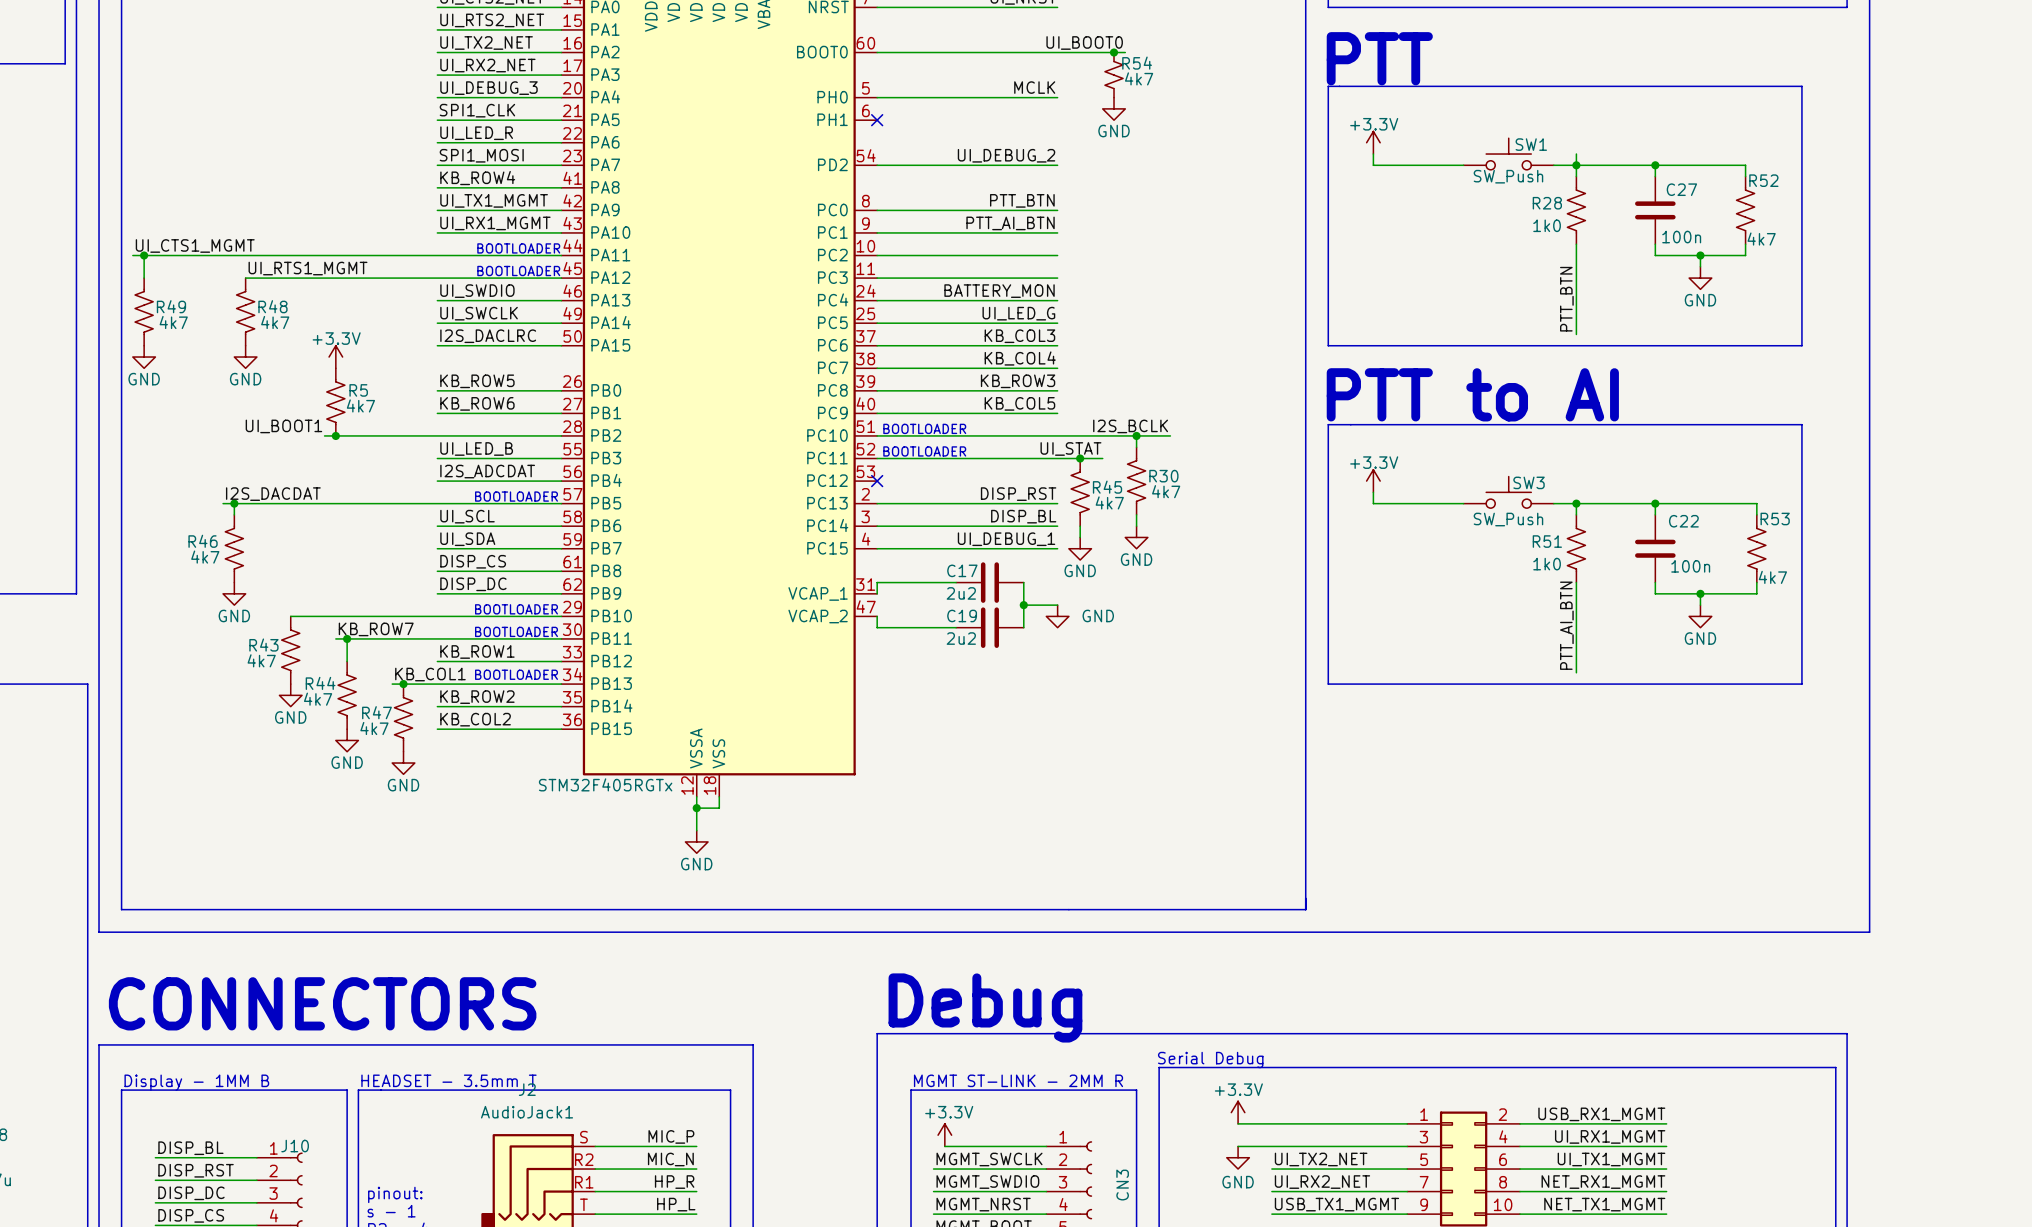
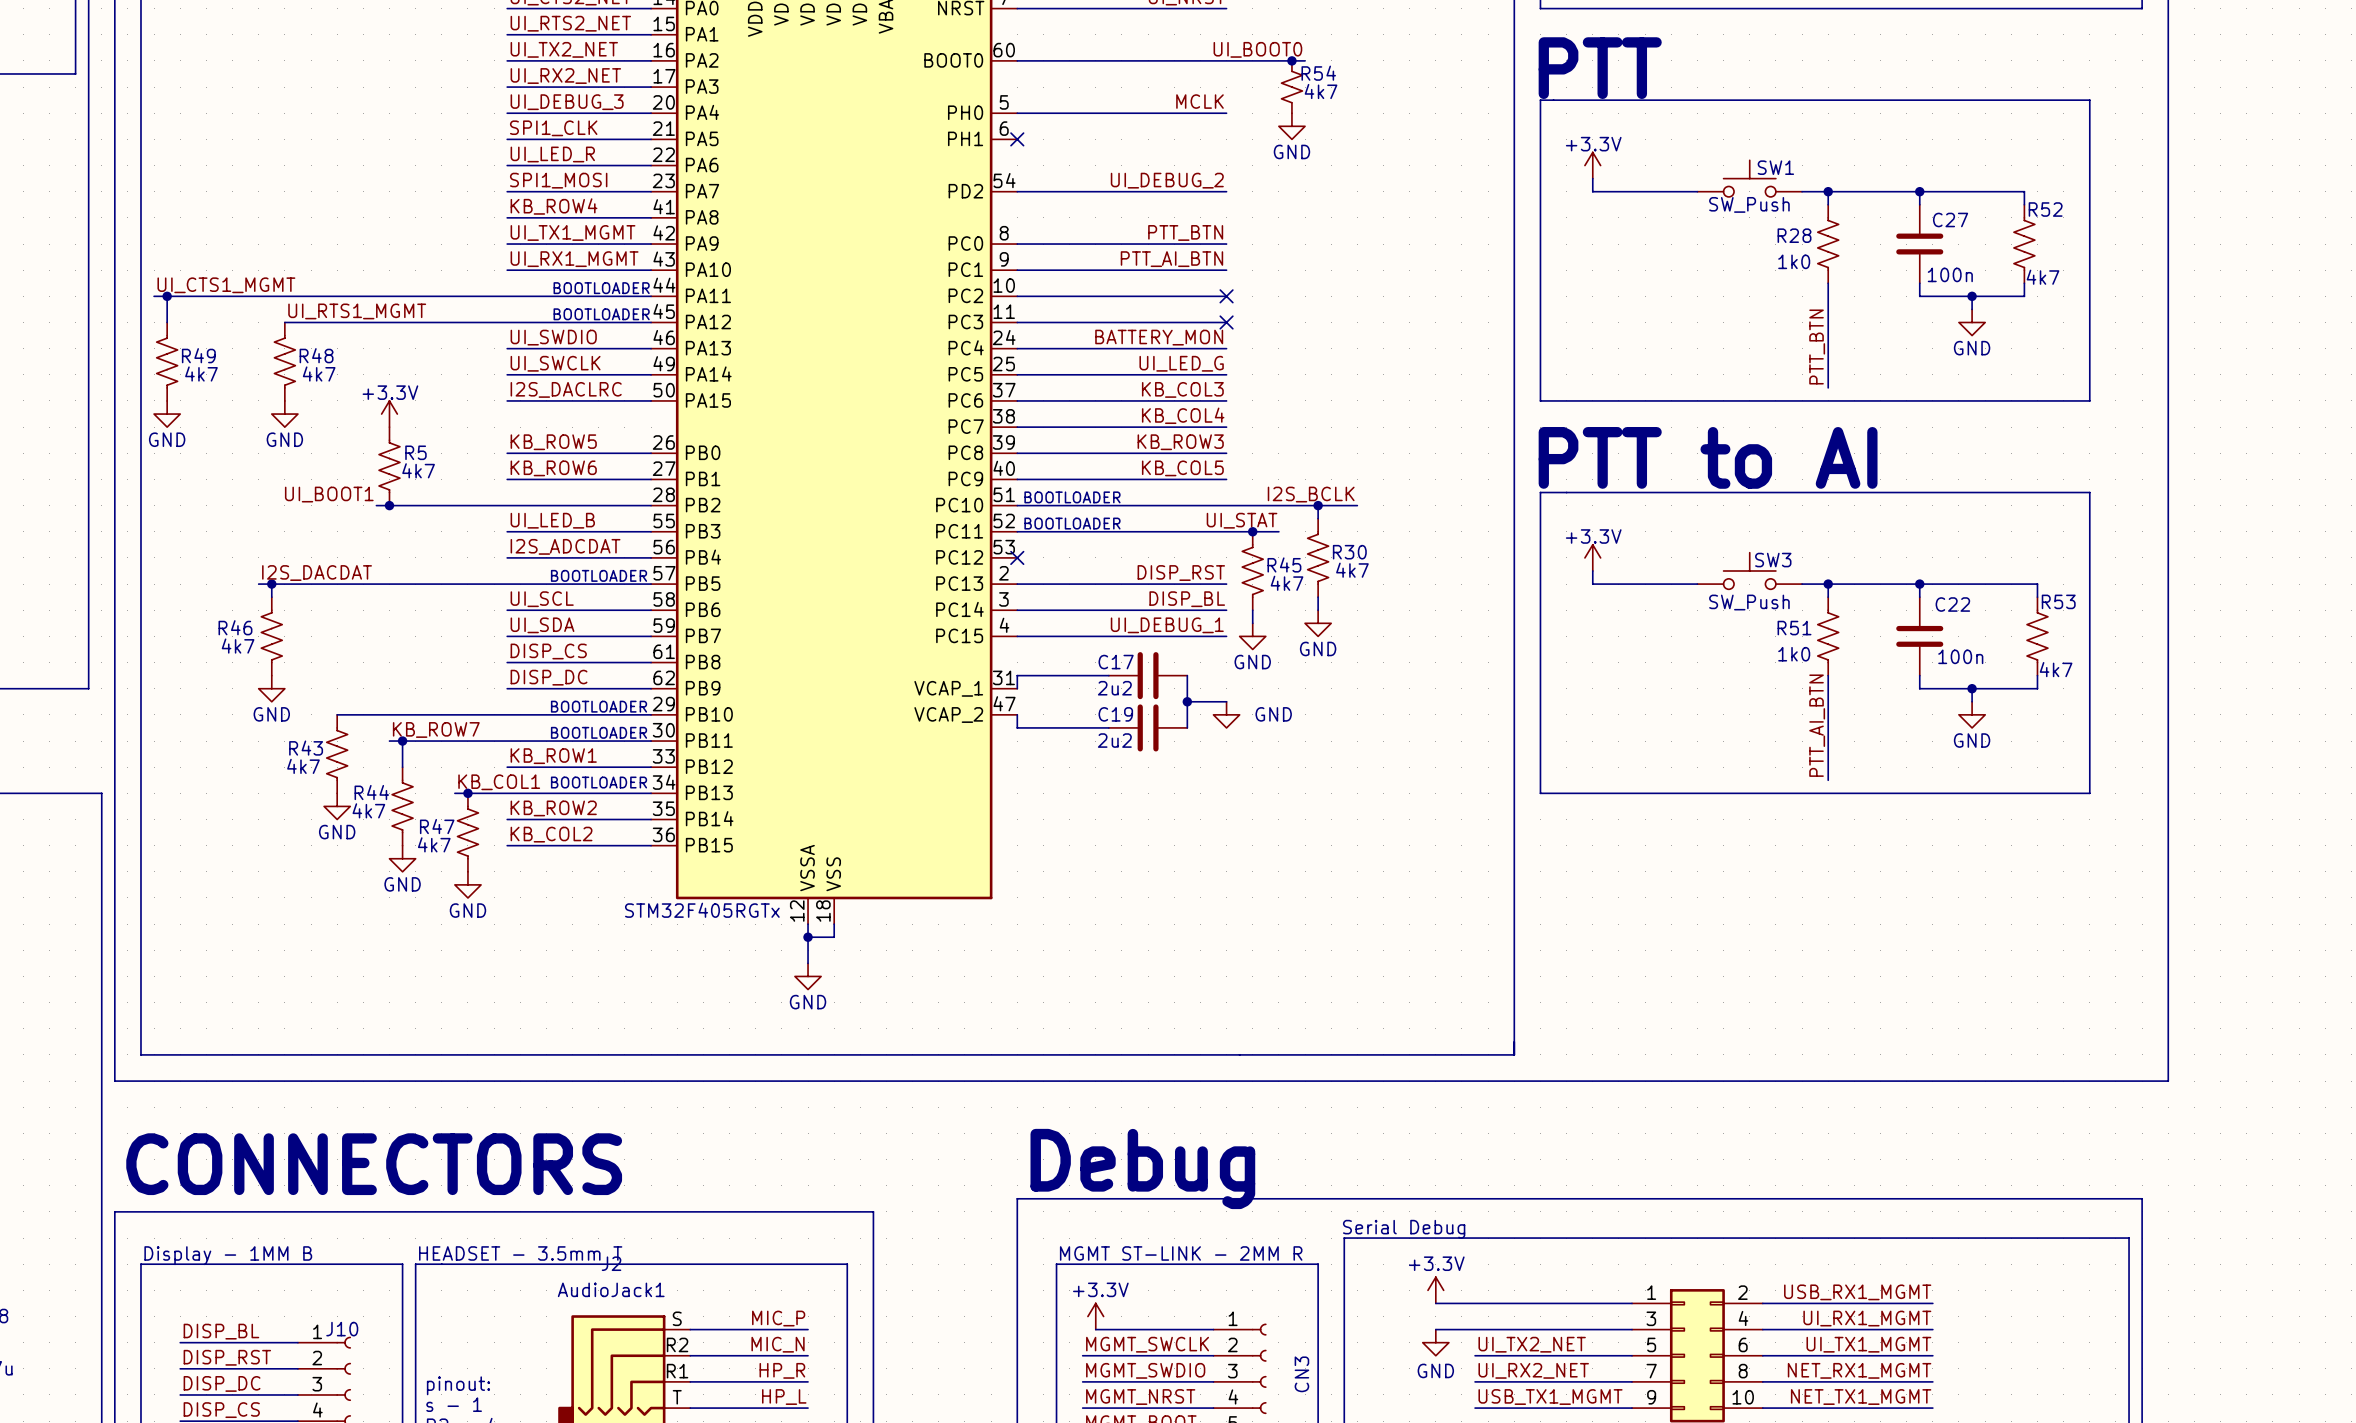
wire: (1576, 154) (1576, 165) -> none
no-connect mark: none -> (1226, 296)
no-connect mark: none -> (1226, 322)

